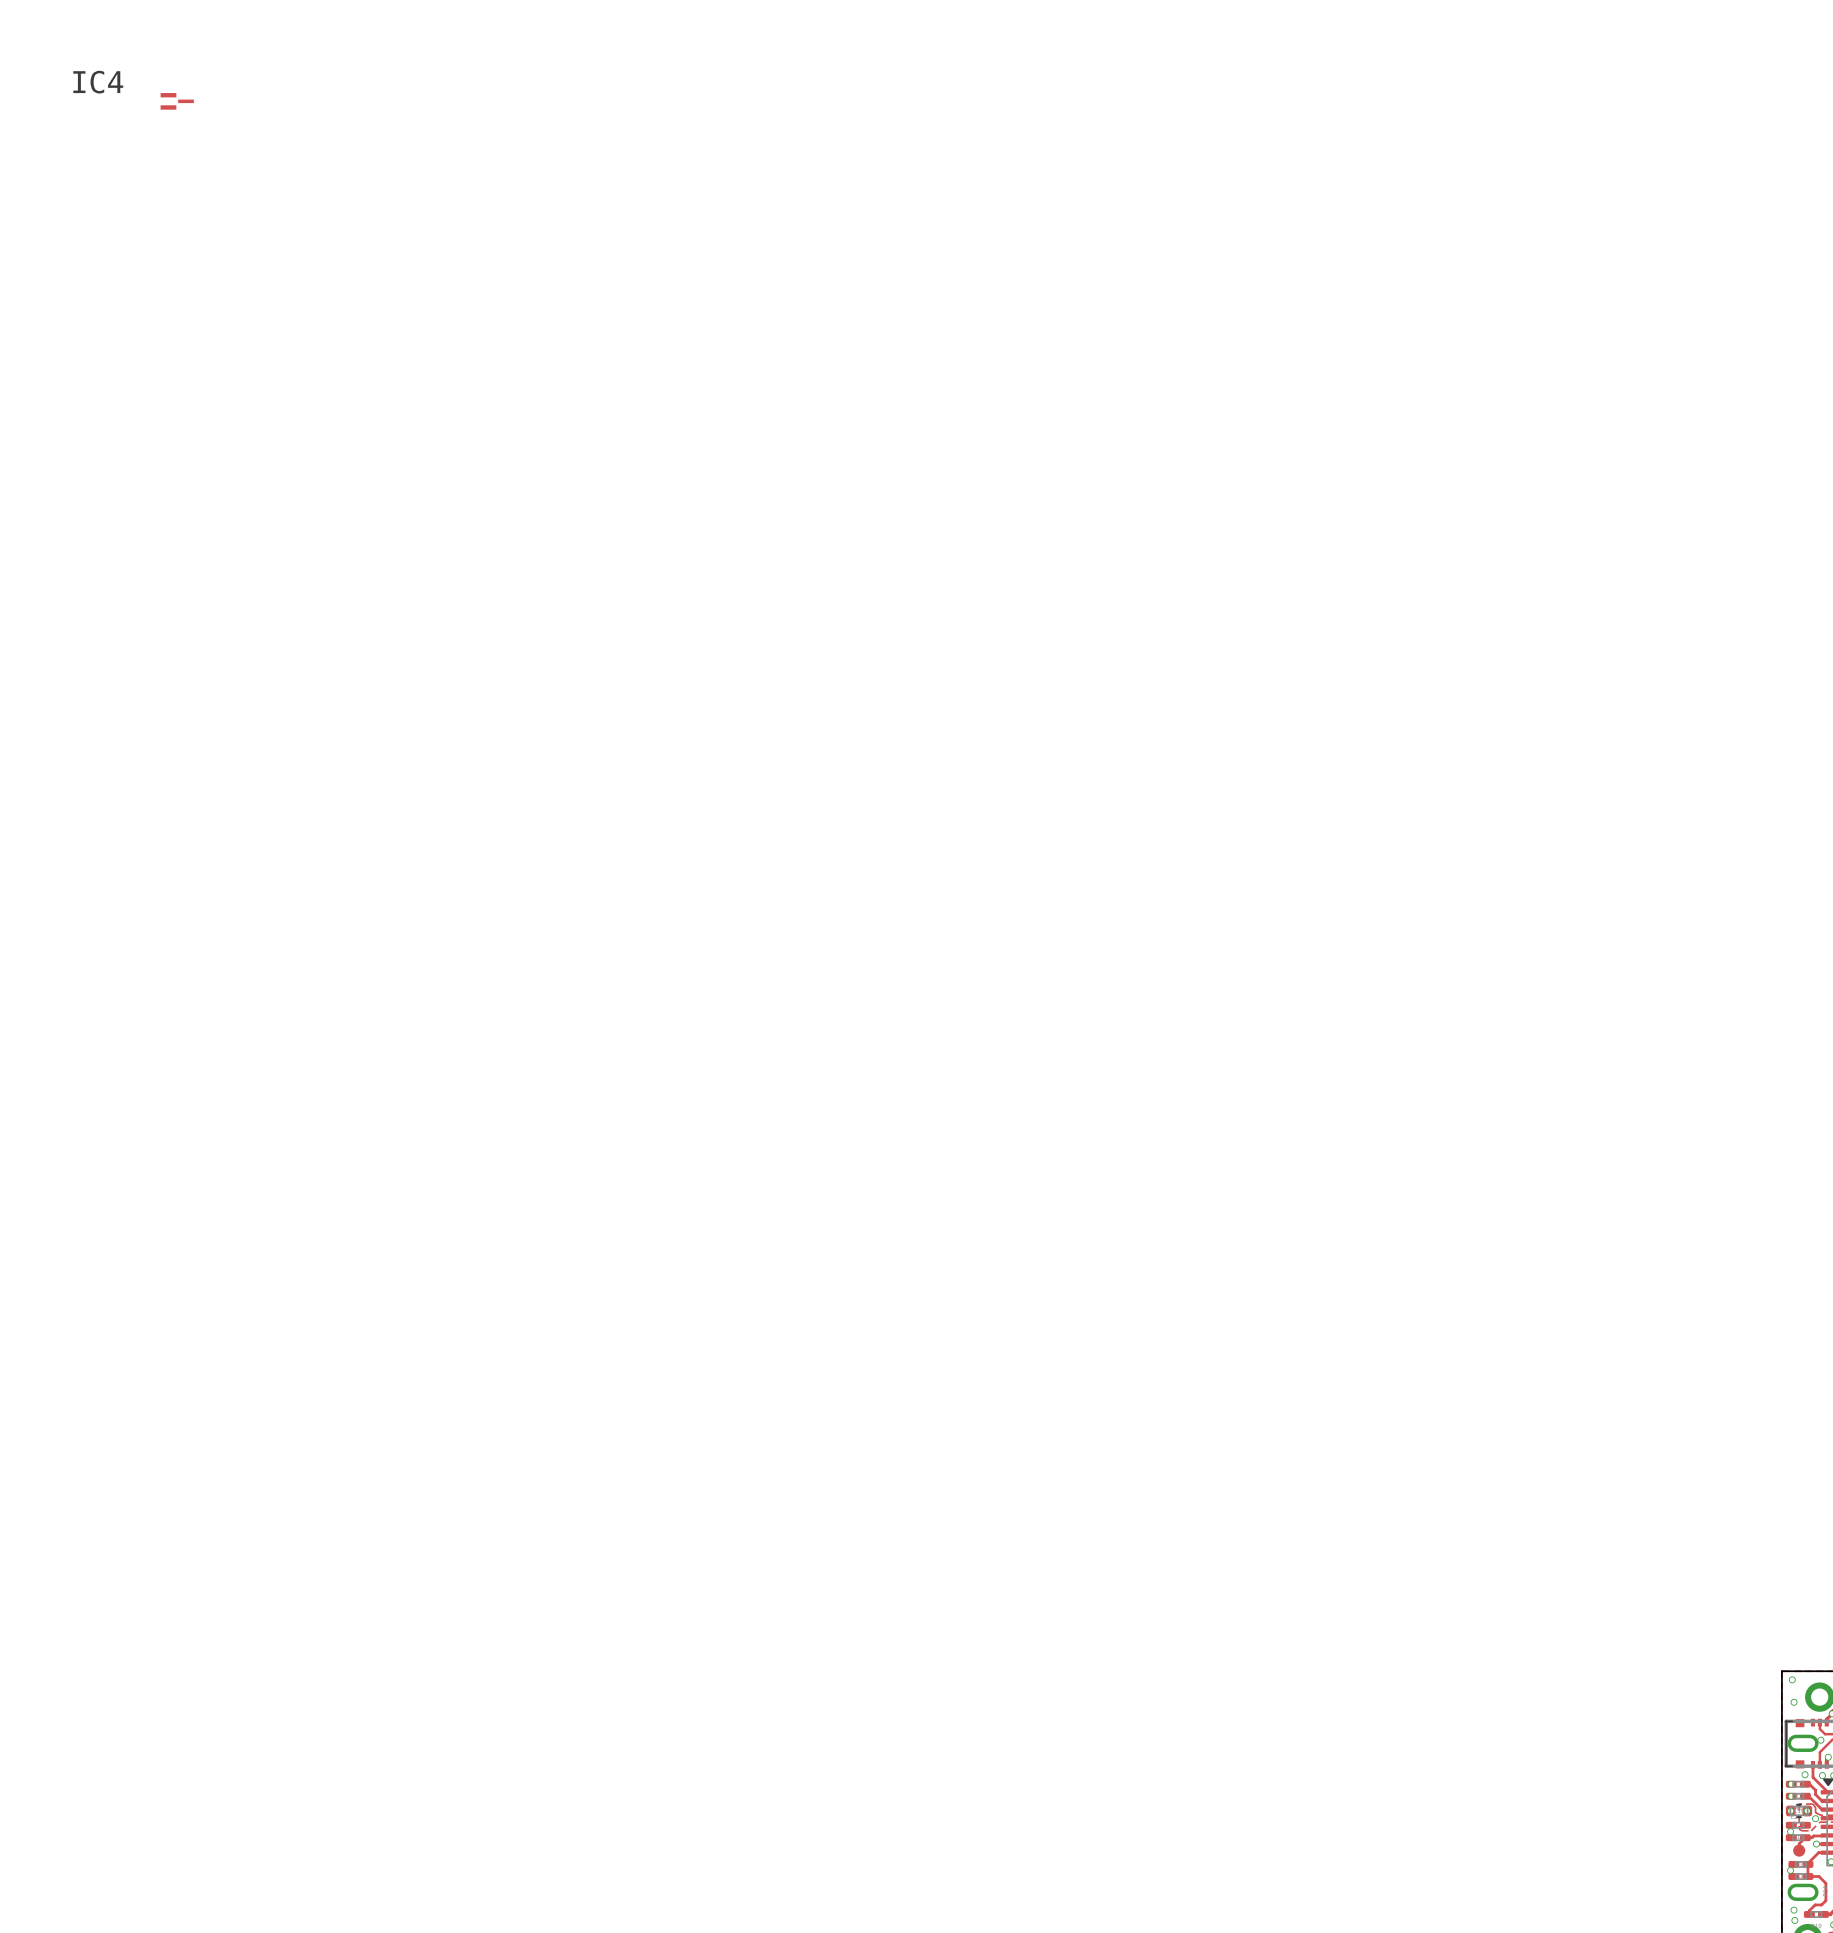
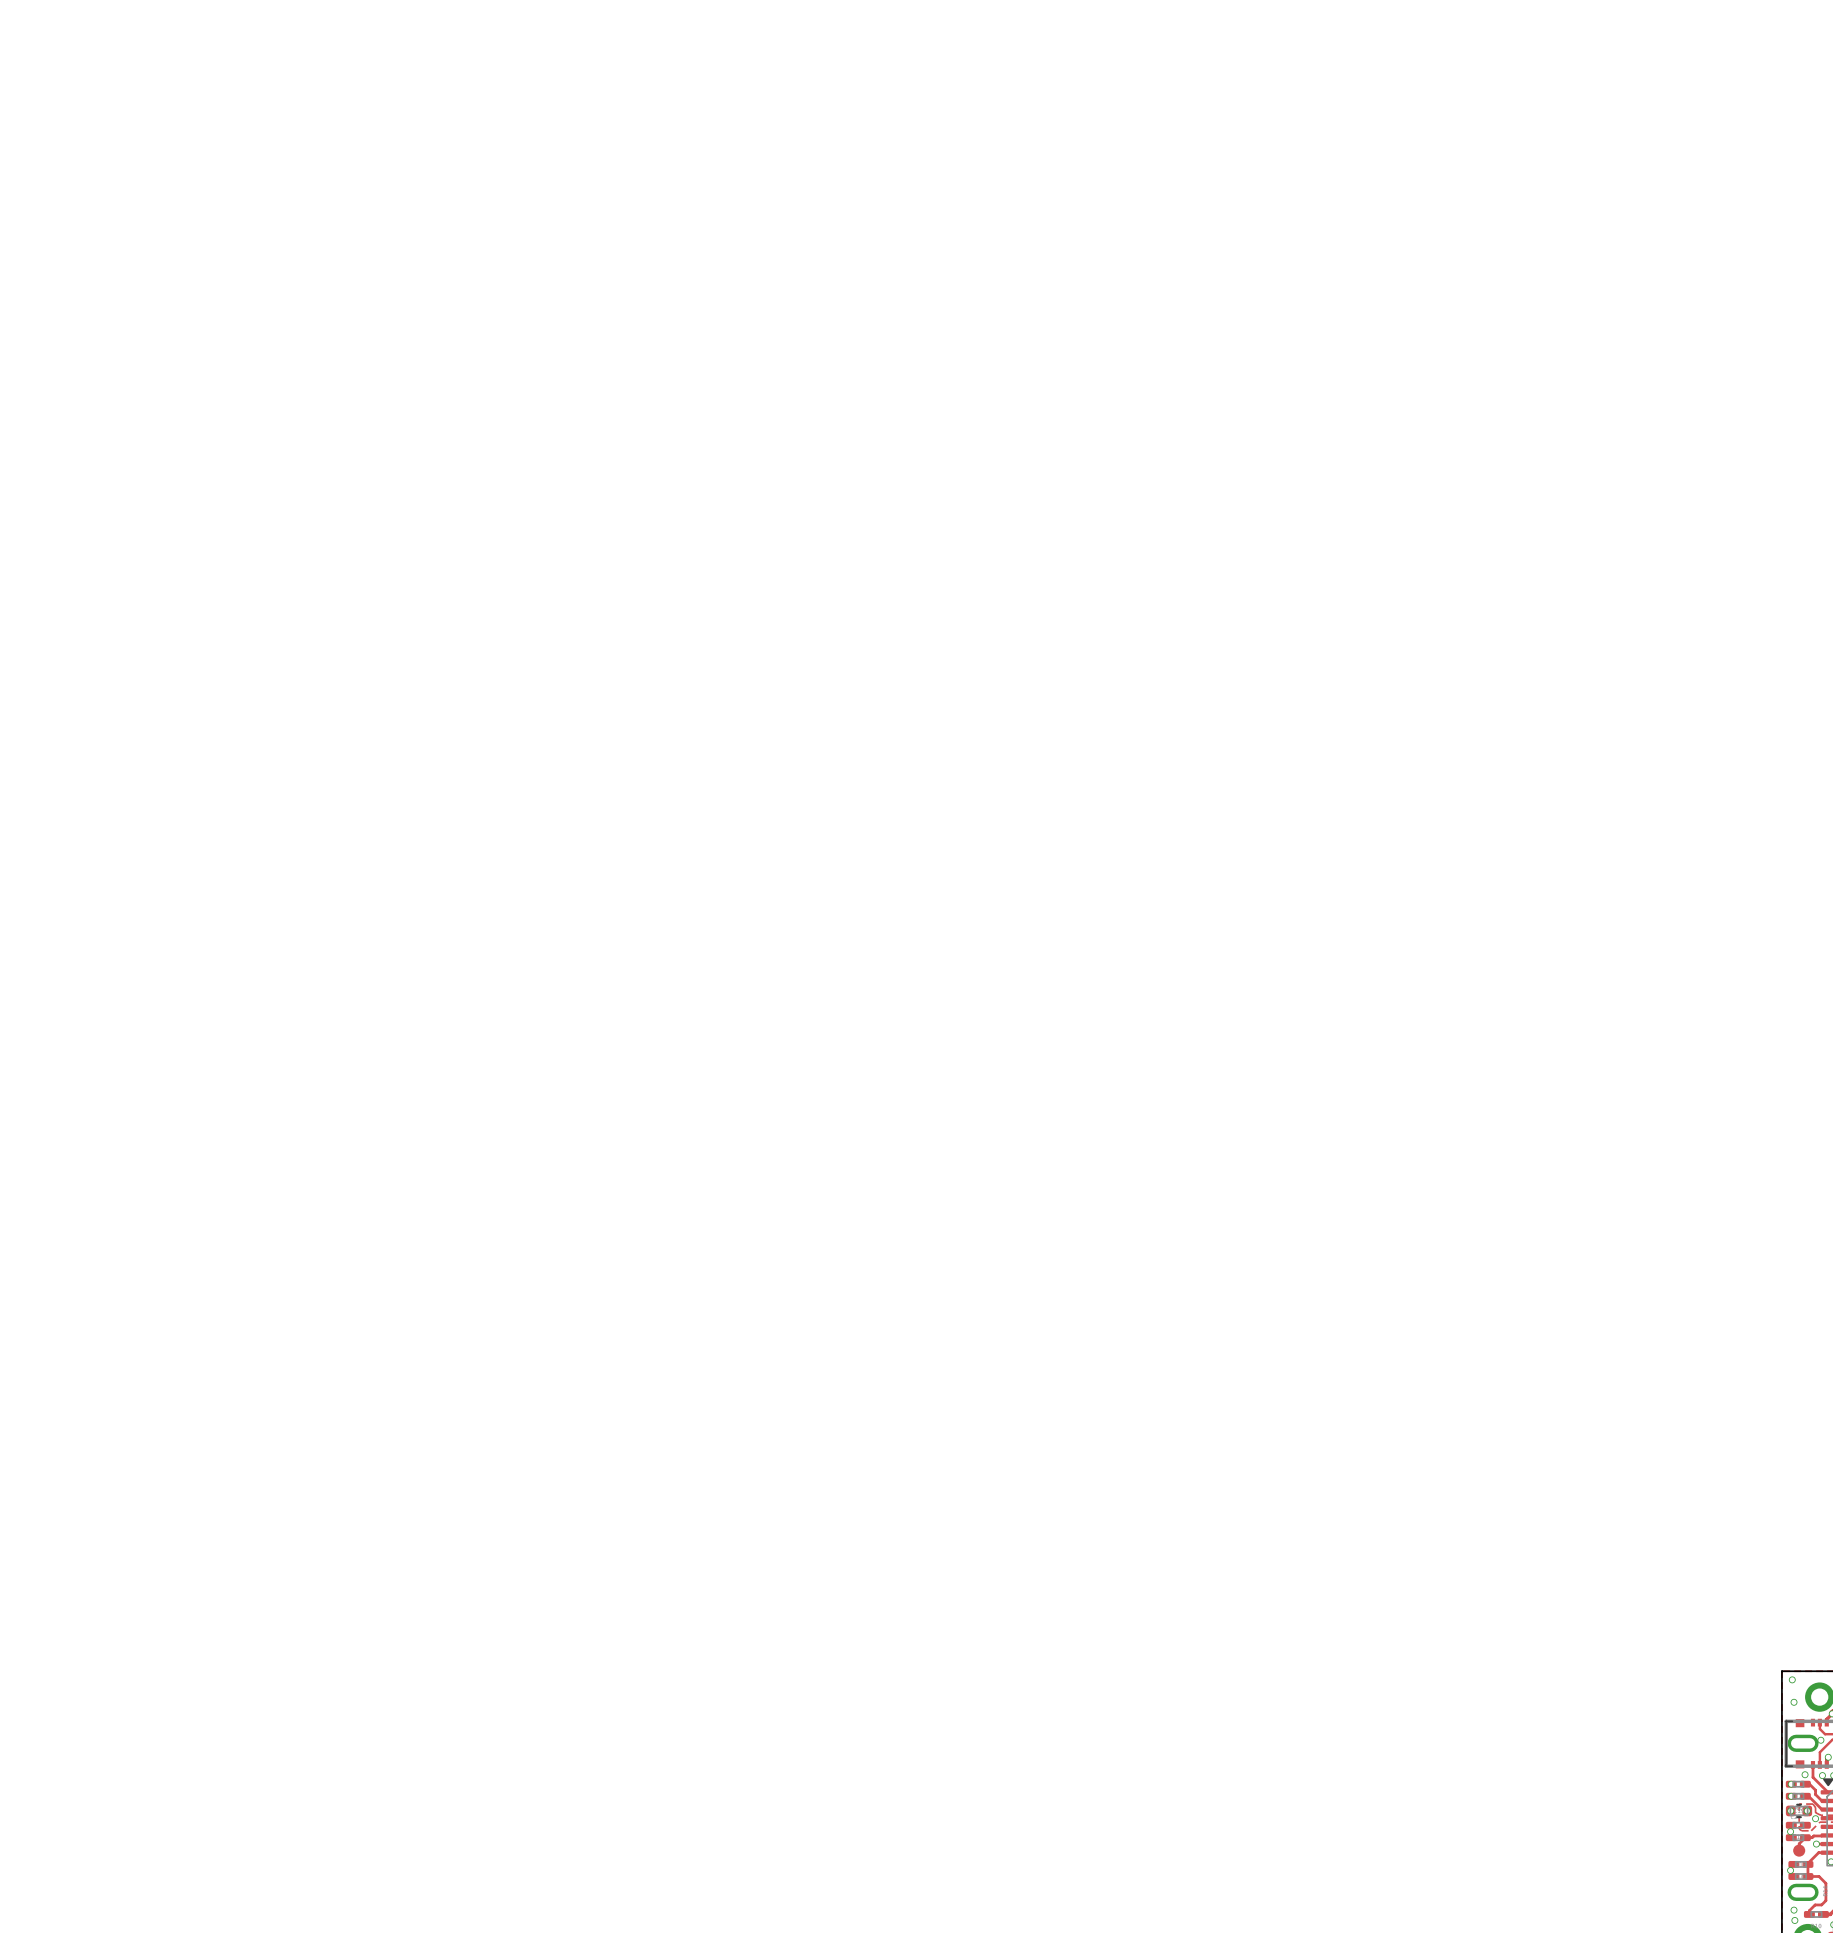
IC4: (177, 101) -> none

